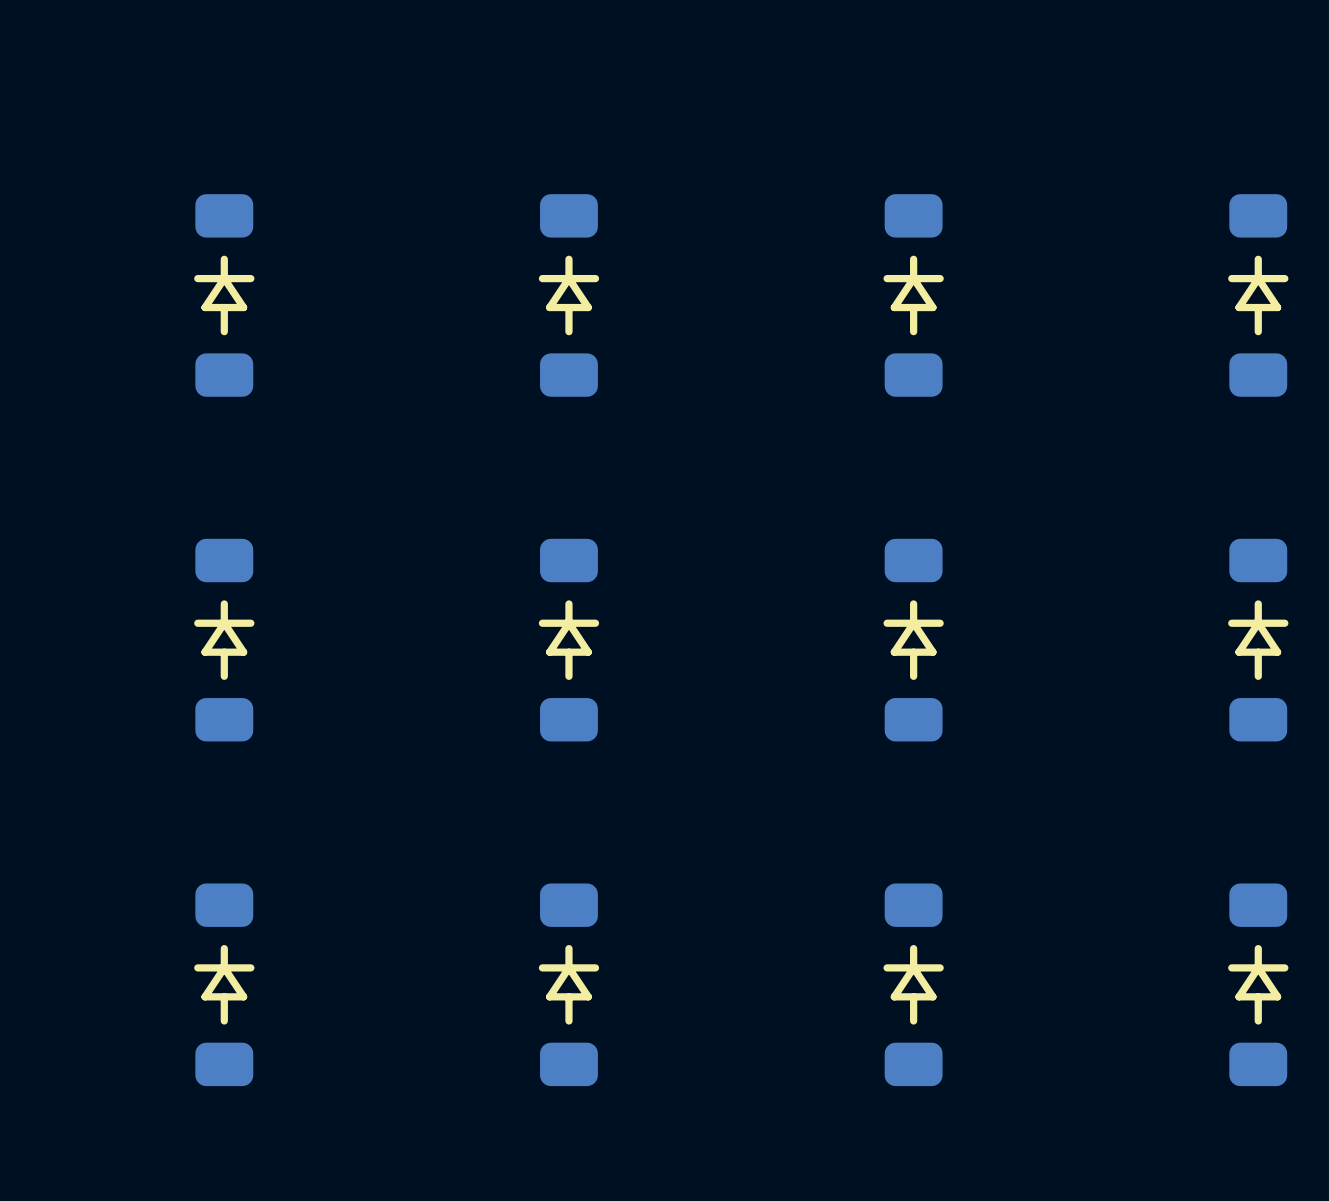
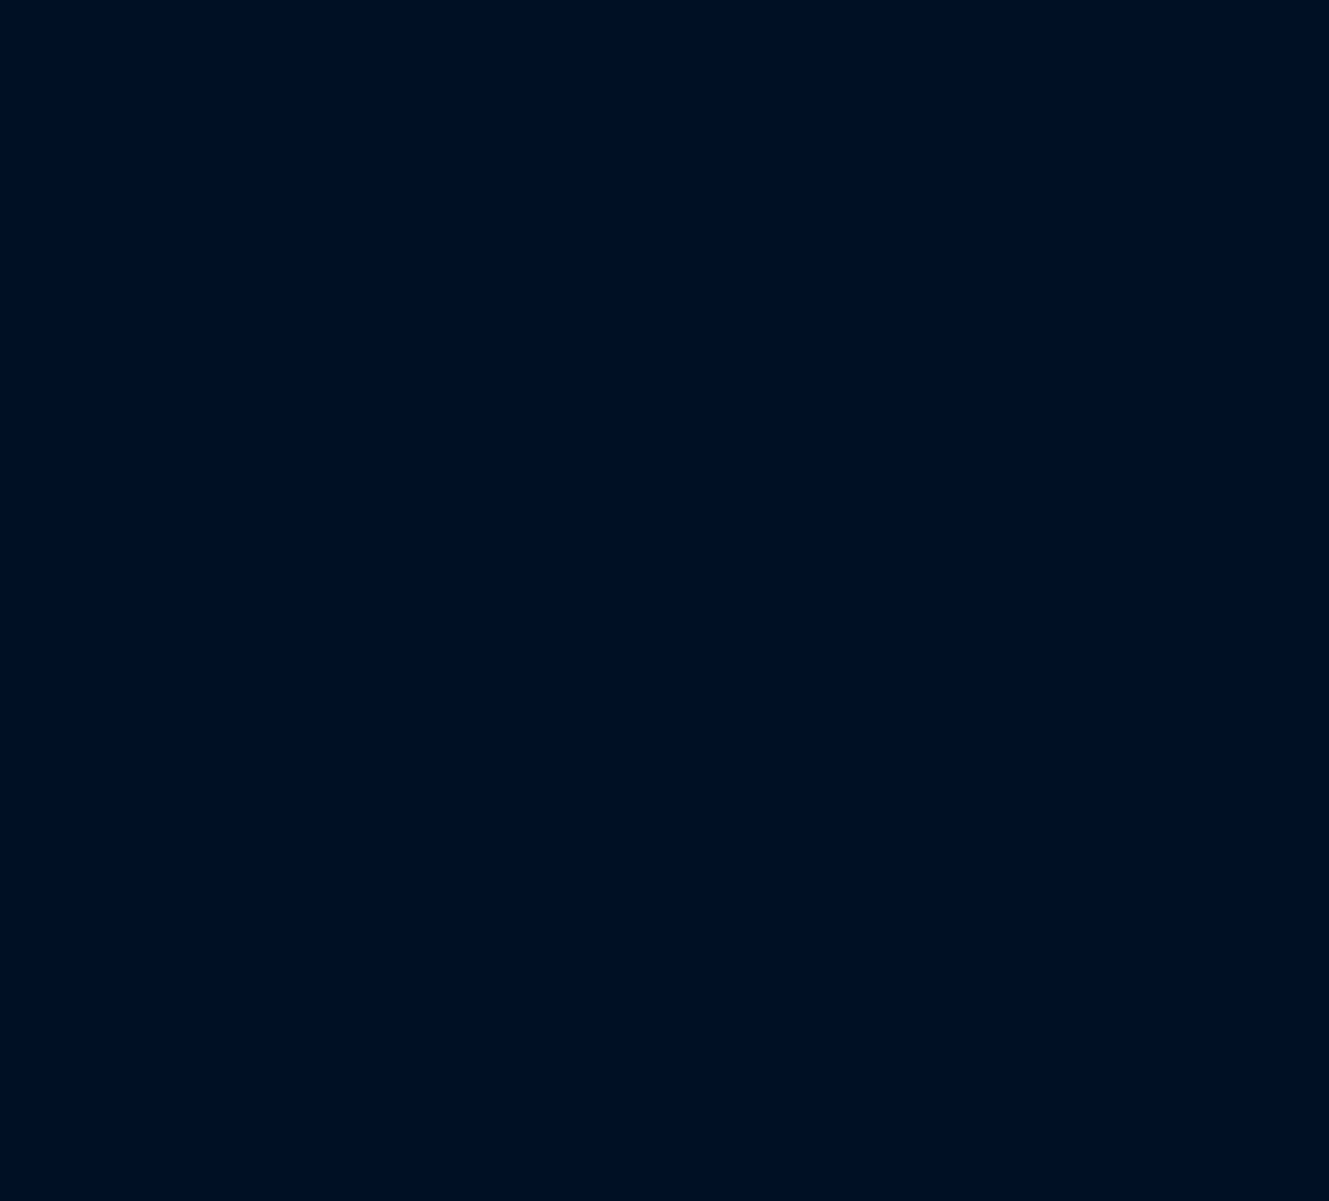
part: (224, 295) -> none
part: (568, 295) -> none
part: (913, 295) -> none
part: (1258, 295) -> none
part: (224, 640) -> none
part: (568, 640) -> none
part: (913, 640) -> none
part: (1258, 640) -> none
part: (224, 984) -> none
part: (568, 984) -> none
part: (913, 984) -> none
part: (1258, 984) -> none

